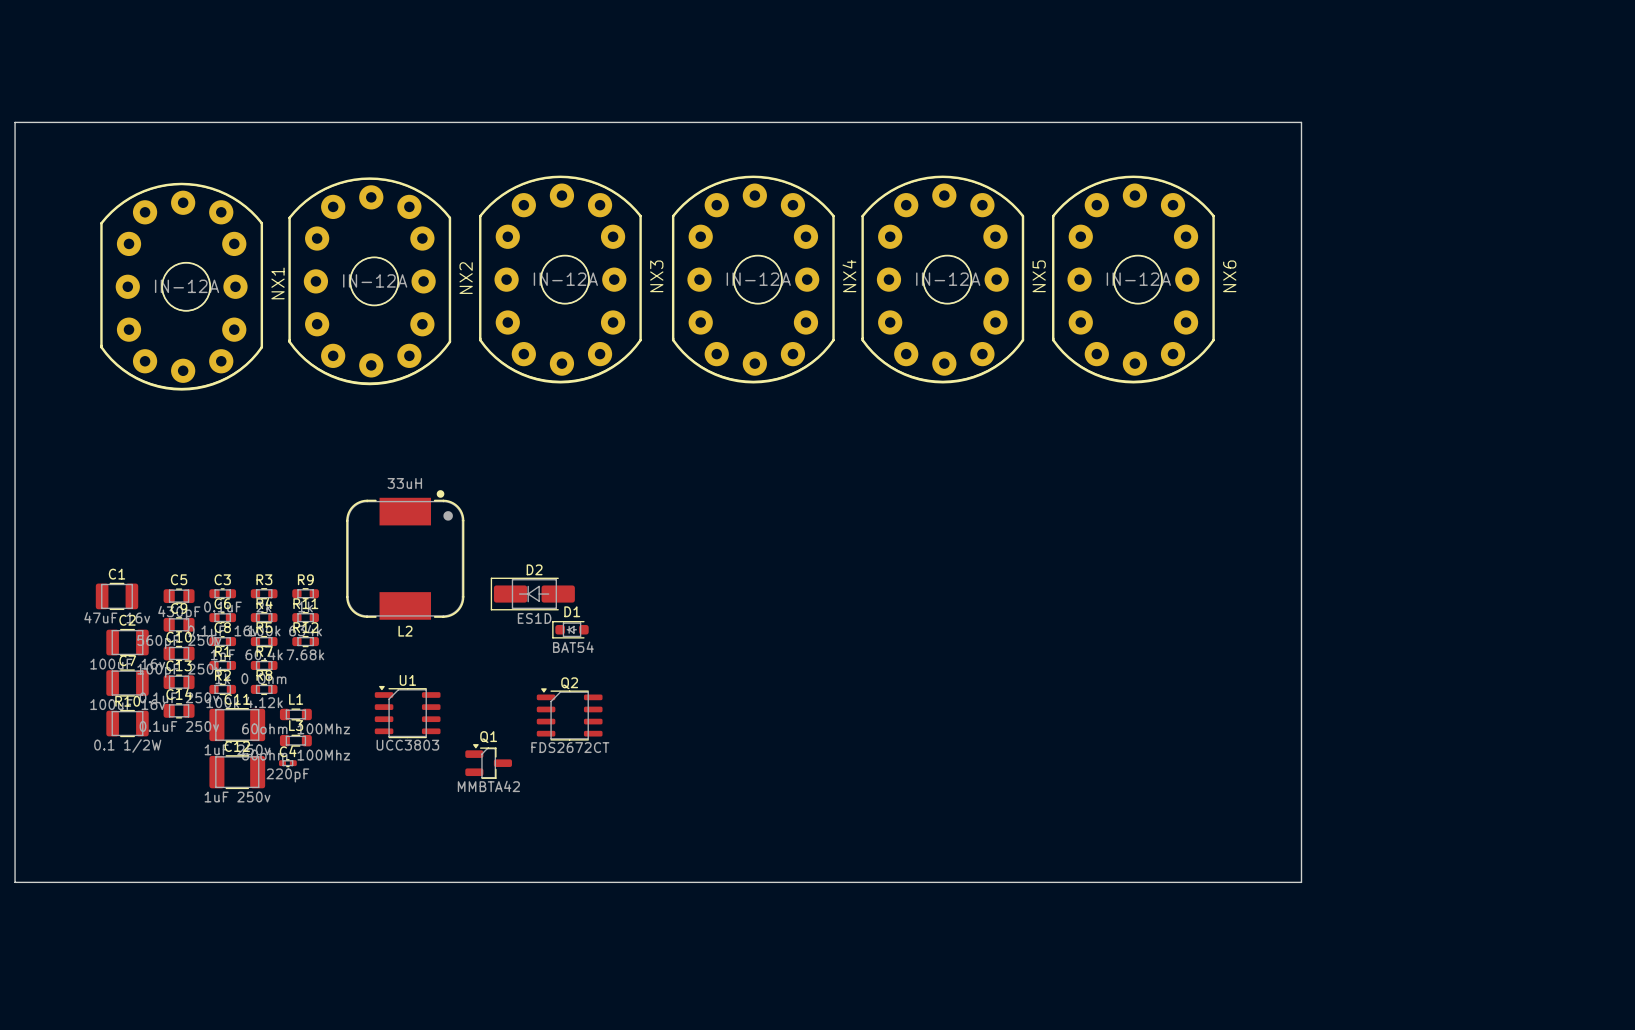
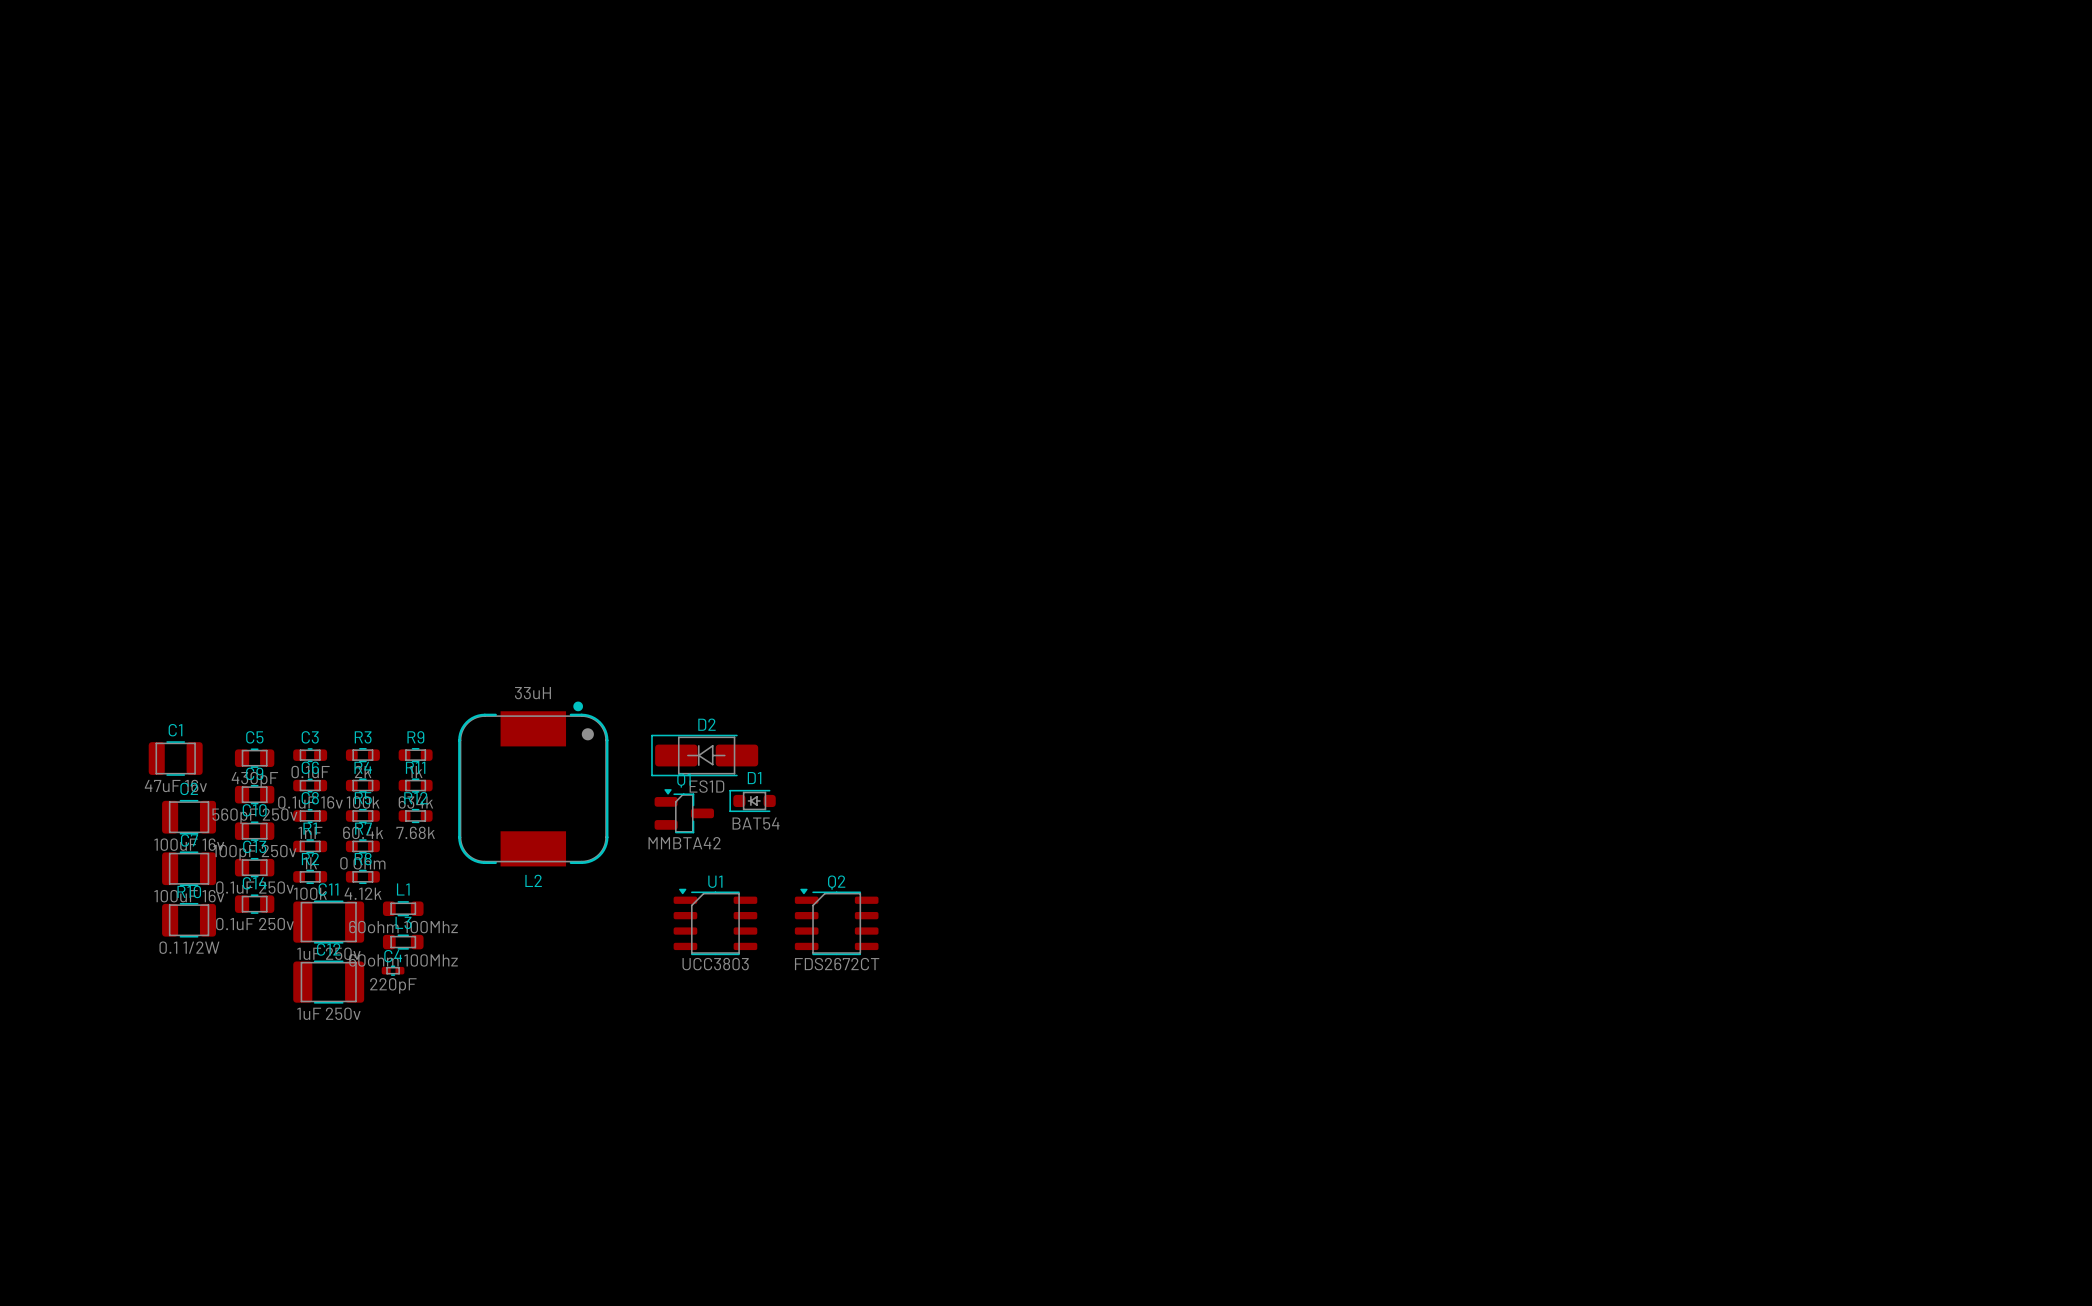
board edge: (15, 122) (1301, 122) (1301, 882) (15, 882) (15, 122) -> none
NX3: IN-12A (560, 279) -> none
NX4: IN-12A (753, 279) -> none
NX5: IN-12A (942, 279) -> none
NX6: IN-12A (1133, 279) -> none
NX2: IN-12A (369, 281) -> none
NX1: IN-12A (181, 286) -> none
L2 position: (405, 554) -> (533, 783)
U1 position: (407, 712) -> (715, 921)
Q2 position: (569, 714) -> (836, 921)
Q1 position: (488, 761) -> (684, 811)

